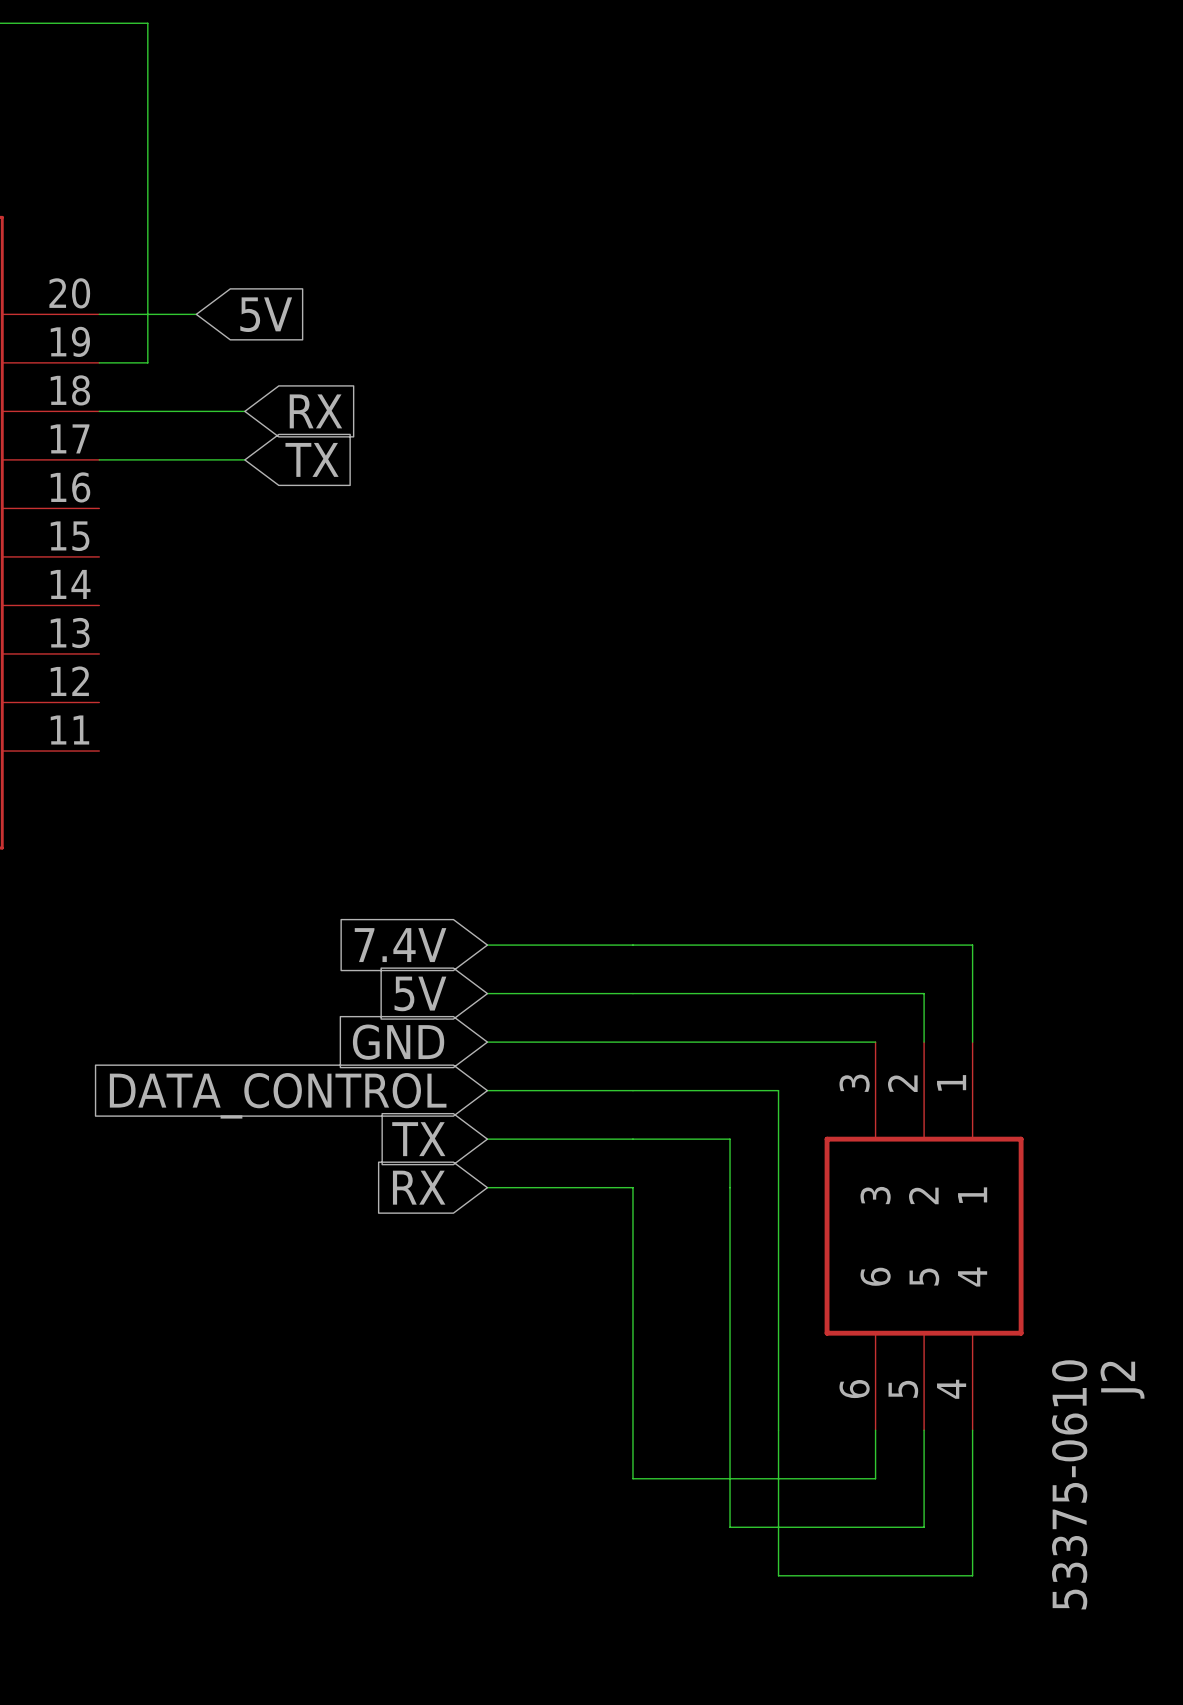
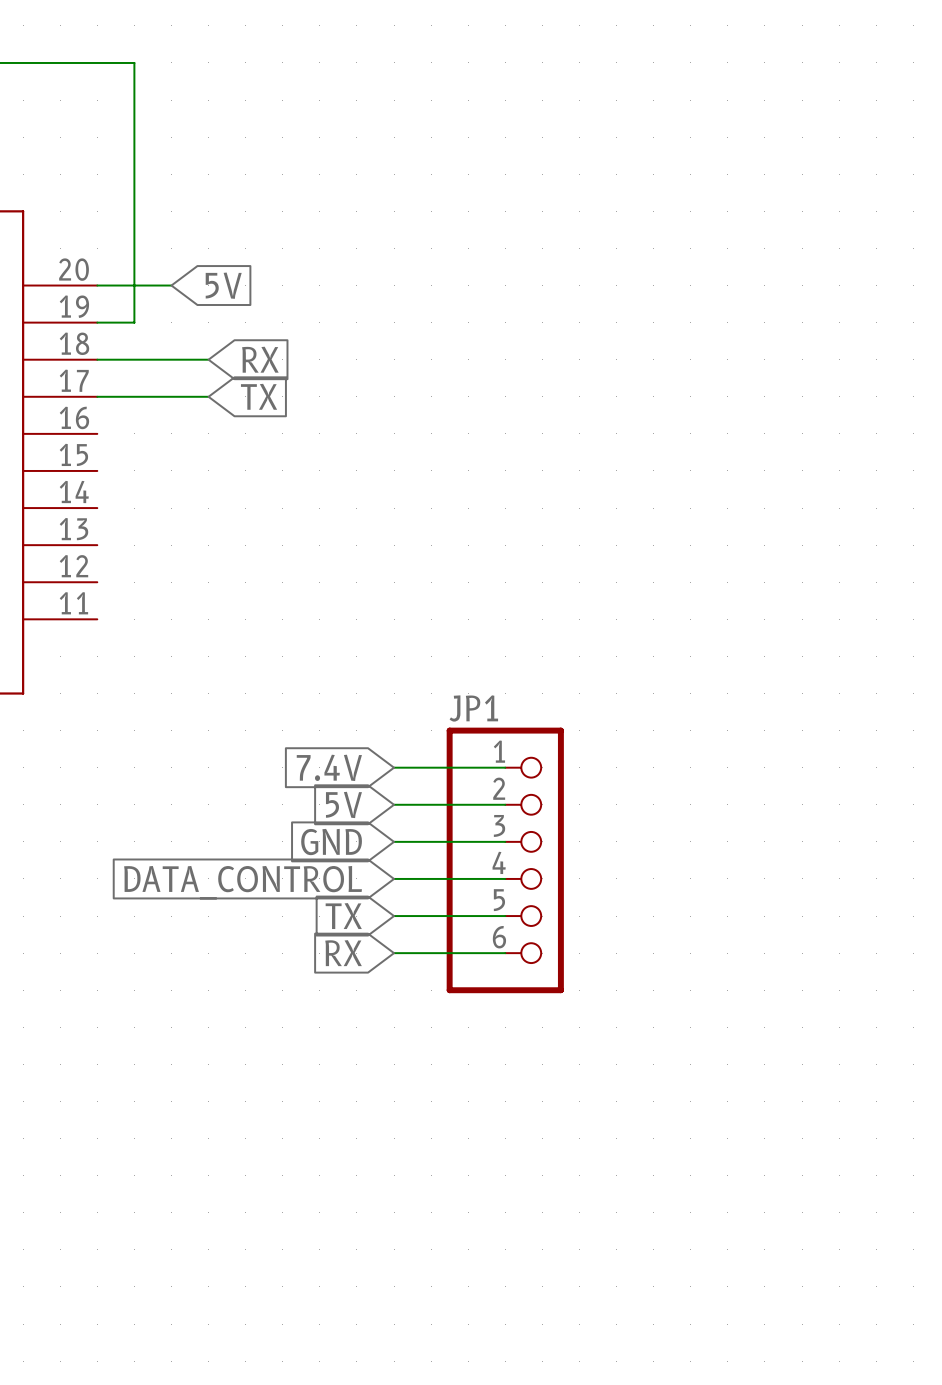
wire: (632, 945) (972, 945) (972, 1042) -> none
wire: (632, 993) (924, 993) (924, 1042) -> none
wire: (632, 1042) (875, 1042) -> none
JP1: none -> (505, 860)
wire: (632, 1090) (778, 1090) (778, 1575) (972, 1575) (972, 1430) -> none
wire: (632, 1139) (730, 1139) (730, 1527) (924, 1527) (924, 1430) -> none
wire: (632, 1187) (632, 1478) (875, 1478) (875, 1430) -> none
J2: 53375-0610 (924, 1236) -> none

